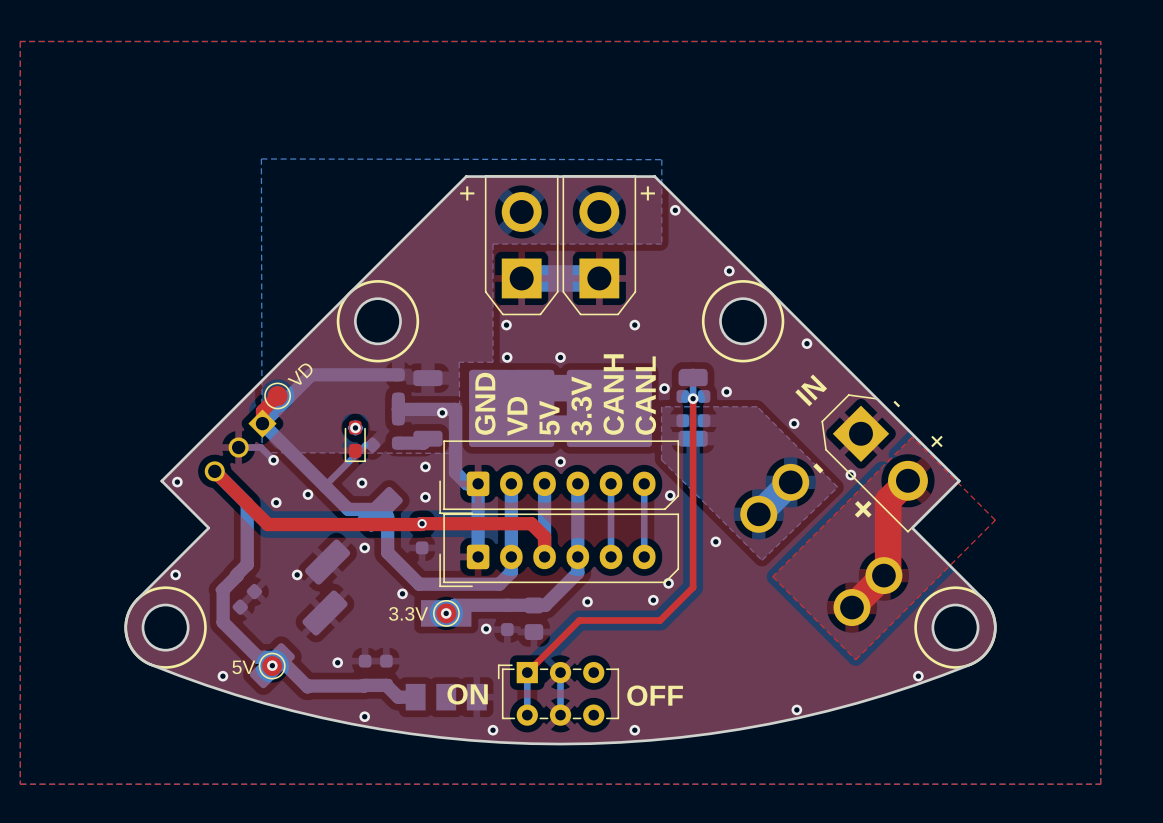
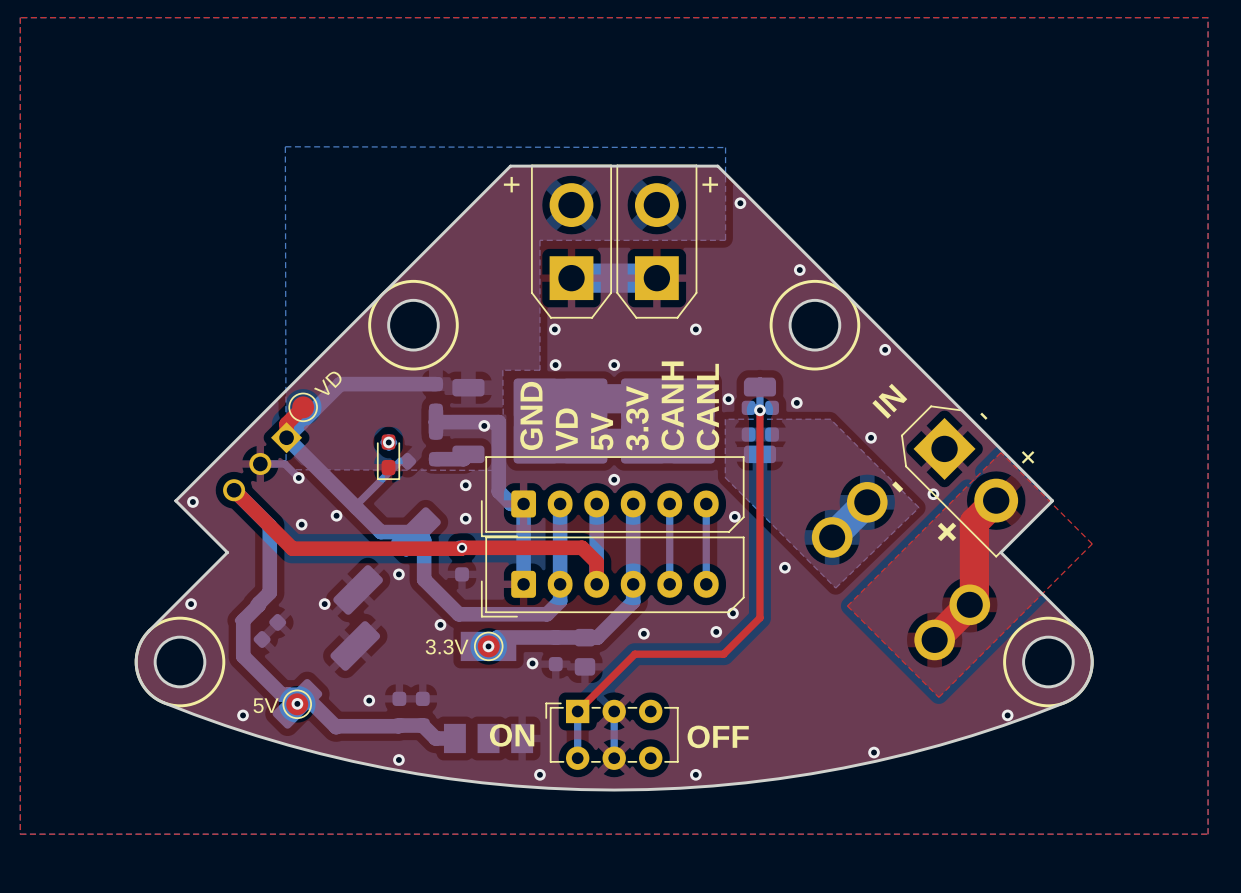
via: (362, 483) -> none

